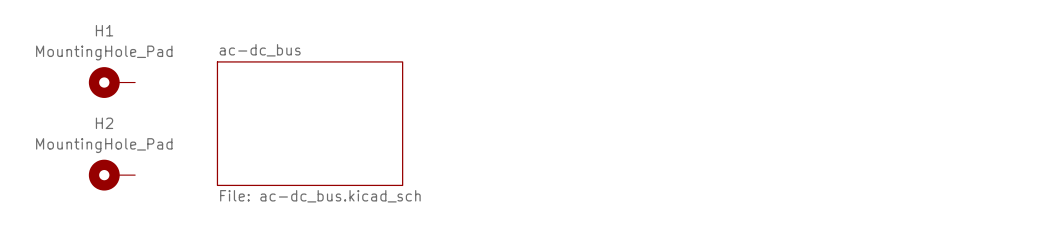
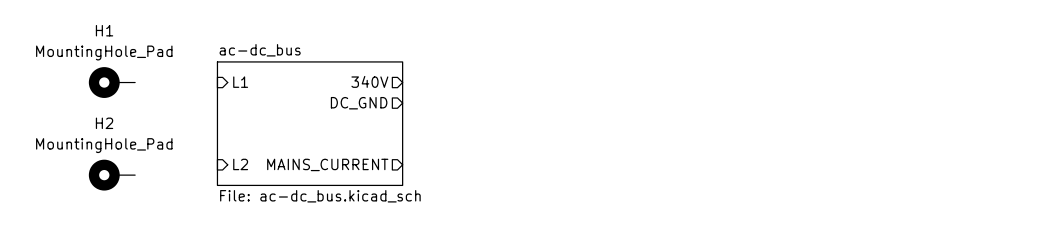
sheet pin: none -> 340V (369, 81)
sheet pin: none -> L1 (240, 82)
sheet pin: none -> DC_GND (359, 103)
sheet pin: none -> L2 (240, 164)
sheet pin: none -> MAINS_CURRENT (327, 164)

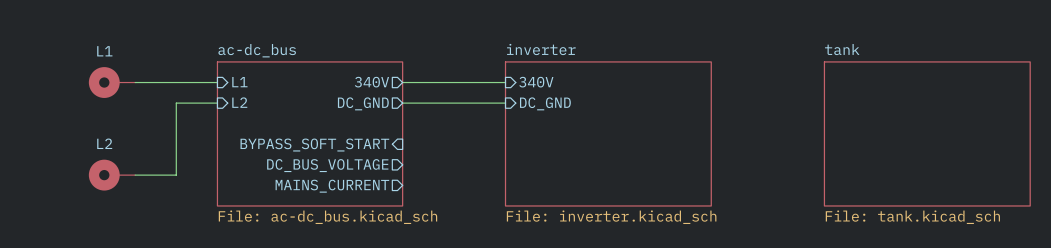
H1 name: H1 (104, 30) -> L1 (104, 51)
H1 value: MountingHole_Pad (104, 52) -> none
sheet pin: none -> 340V (536, 82)
wire: none -> (135, 82) (217, 82)
wire: none -> (402, 82) (505, 82)
wire: none -> (217, 103) (176, 103) (176, 175) (135, 175)
wire: none -> (402, 103) (505, 103)
sheet pin: none -> DC_GND (545, 103)
H2 name: H2 (104, 123) -> L2 (104, 143)
sheet ac-dc_bus: File: ac-dc_bus.kicad_sch (310, 123) -> none
sheet ac-dc_bus: none -> File: ac-dc_bus.kicad_sch (310, 133)
sheet inverter: none -> File: inverter.kicad_sch (608, 133)
sheet tank: none -> File: tank.kicad_sch (927, 133)
sheet pin: none -> BYPASS_SOFT_START (314, 145)
H2 value: MountingHole_Pad (104, 145) -> none
sheet pin position: L2 (240, 164) -> L2 (239, 102)
sheet pin: MAINS_CURRENT (327, 164) -> DC_BUS_VOLTAGE (327, 165)
sheet pin: none -> MAINS_CURRENT (332, 186)

